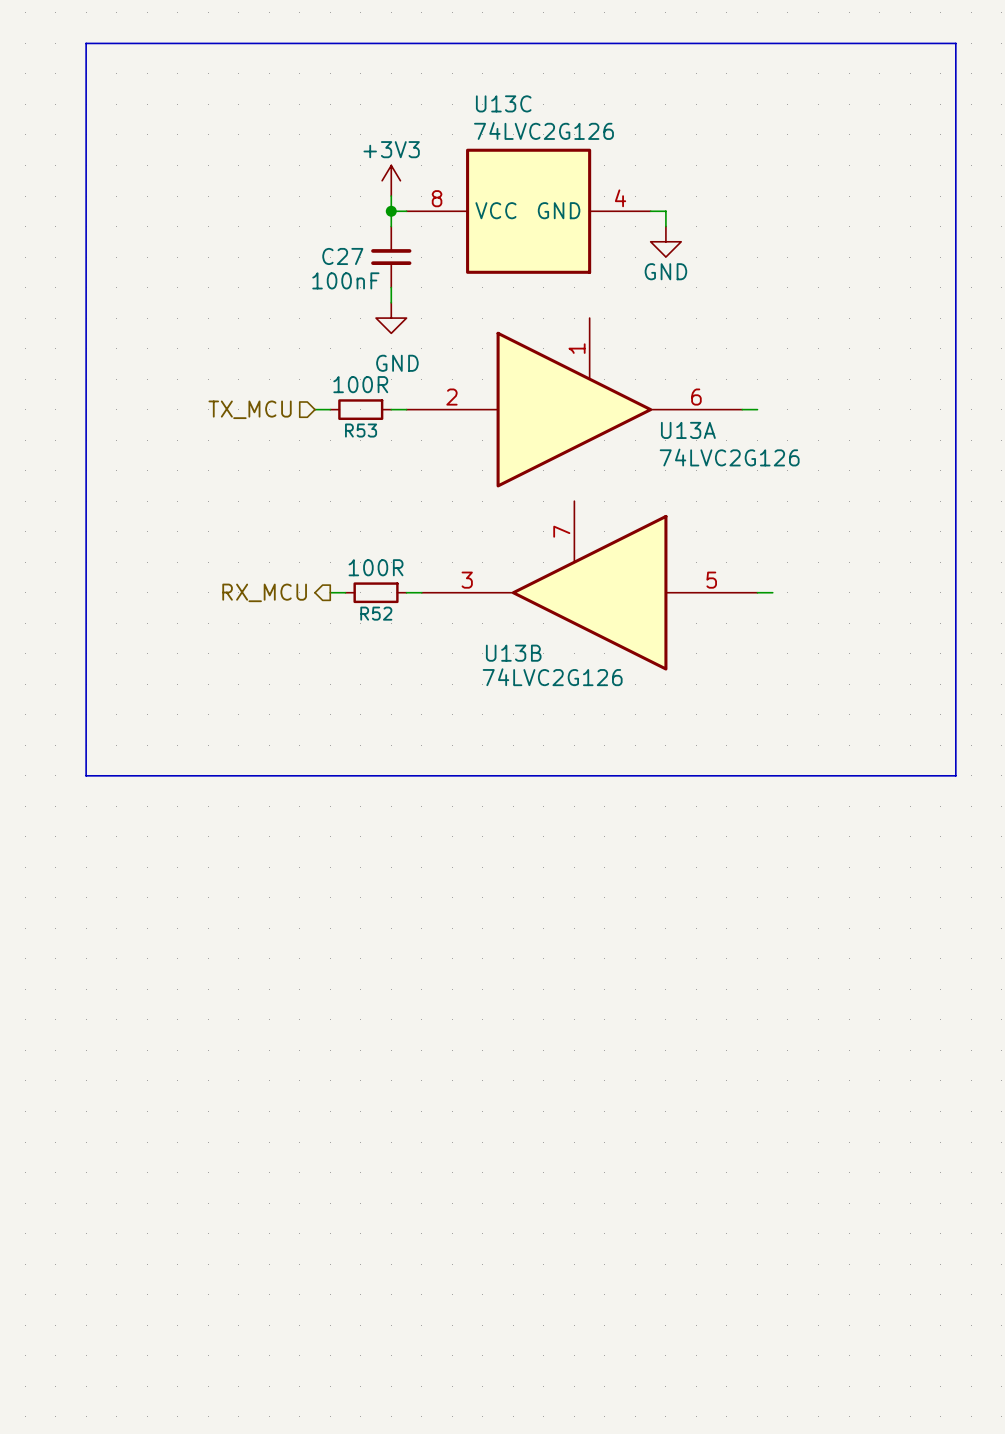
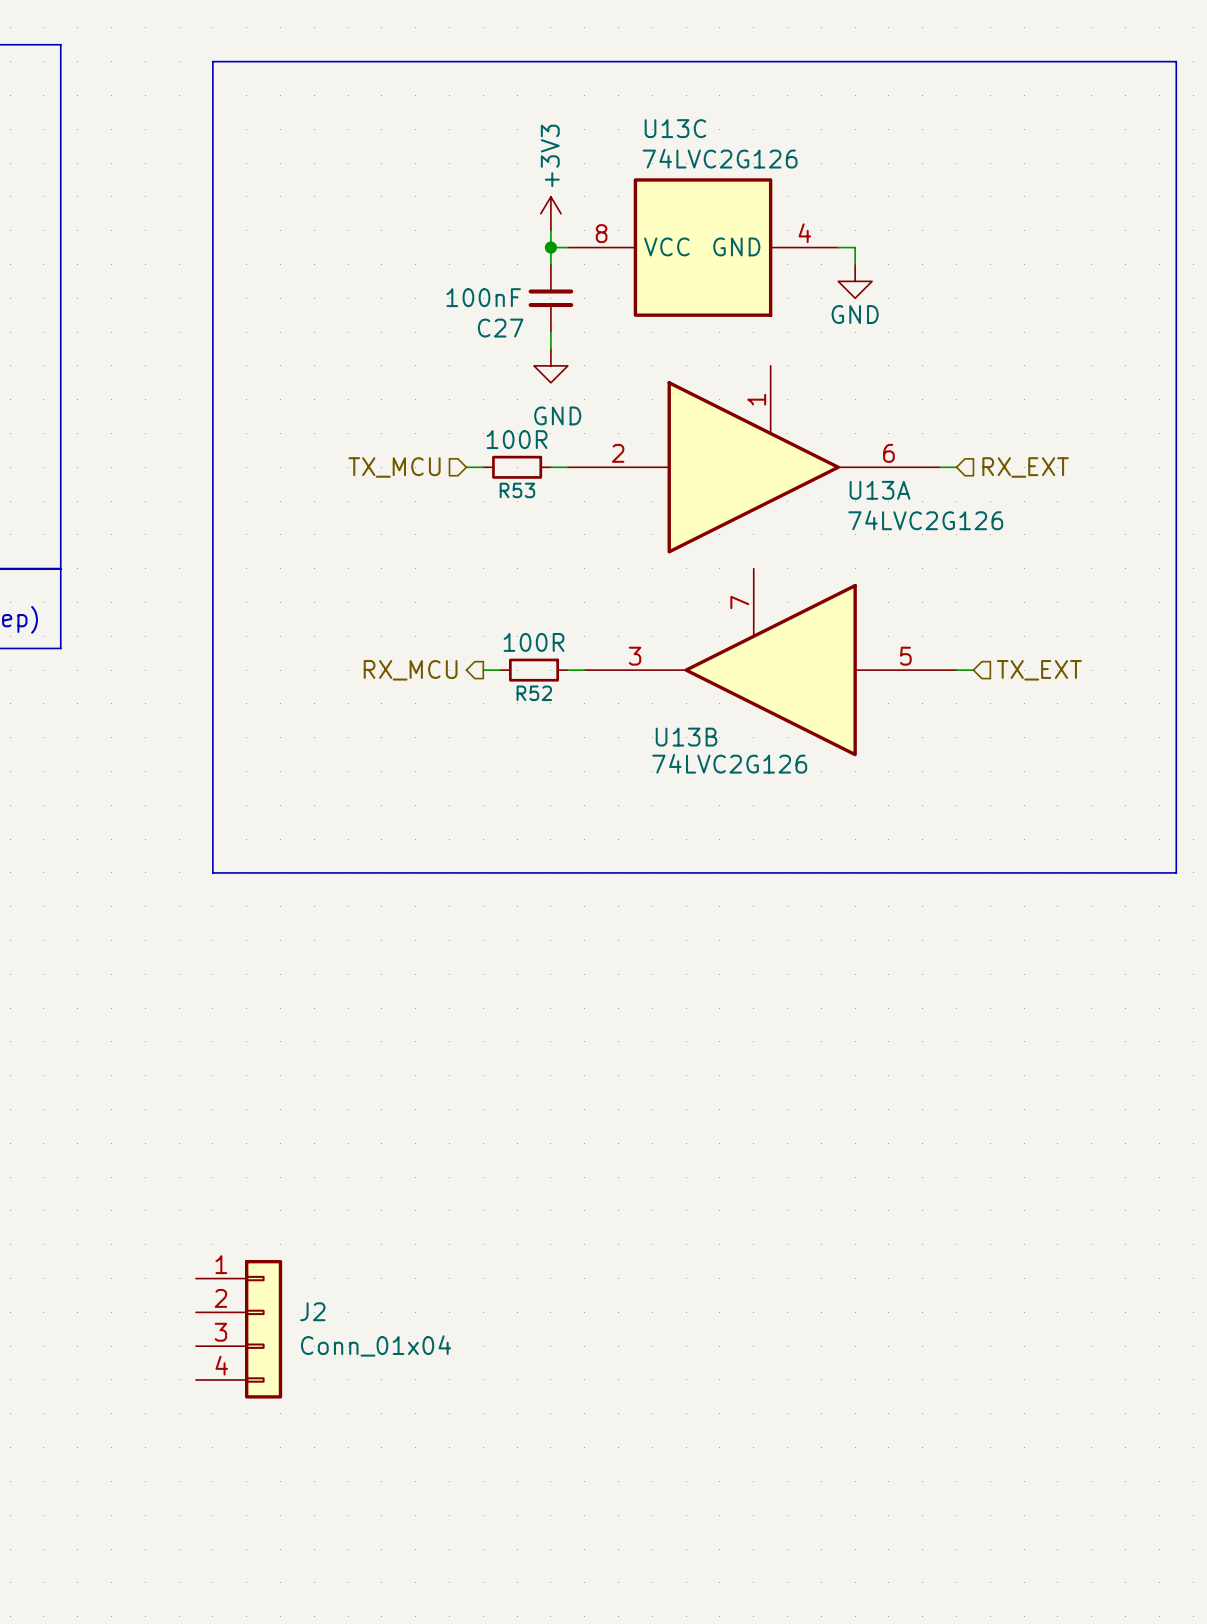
power symbol text rotation: 0° (391, 149) -> 90° counterclockwise (550, 155)
C27 name position: C27 (342, 256) -> C27 (500, 328)
C27 value position: 100nF (345, 280) -> 100nF (483, 297)
hierarchical label: none -> RX_EXT (1025, 467)
hierarchical label: none -> TX_EXT (1039, 670)
J2: none -> Conn_01x04 (239, 1329)

